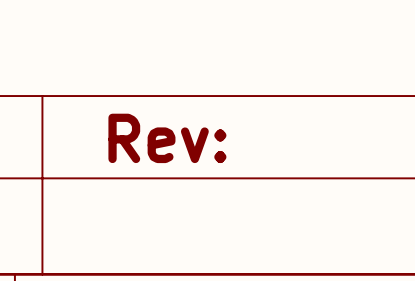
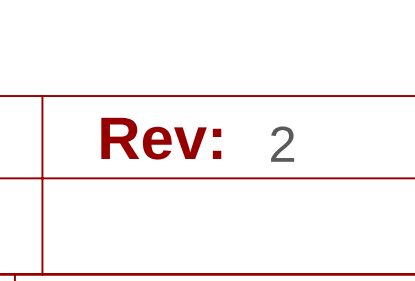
text: none -> 2 (282, 144)

